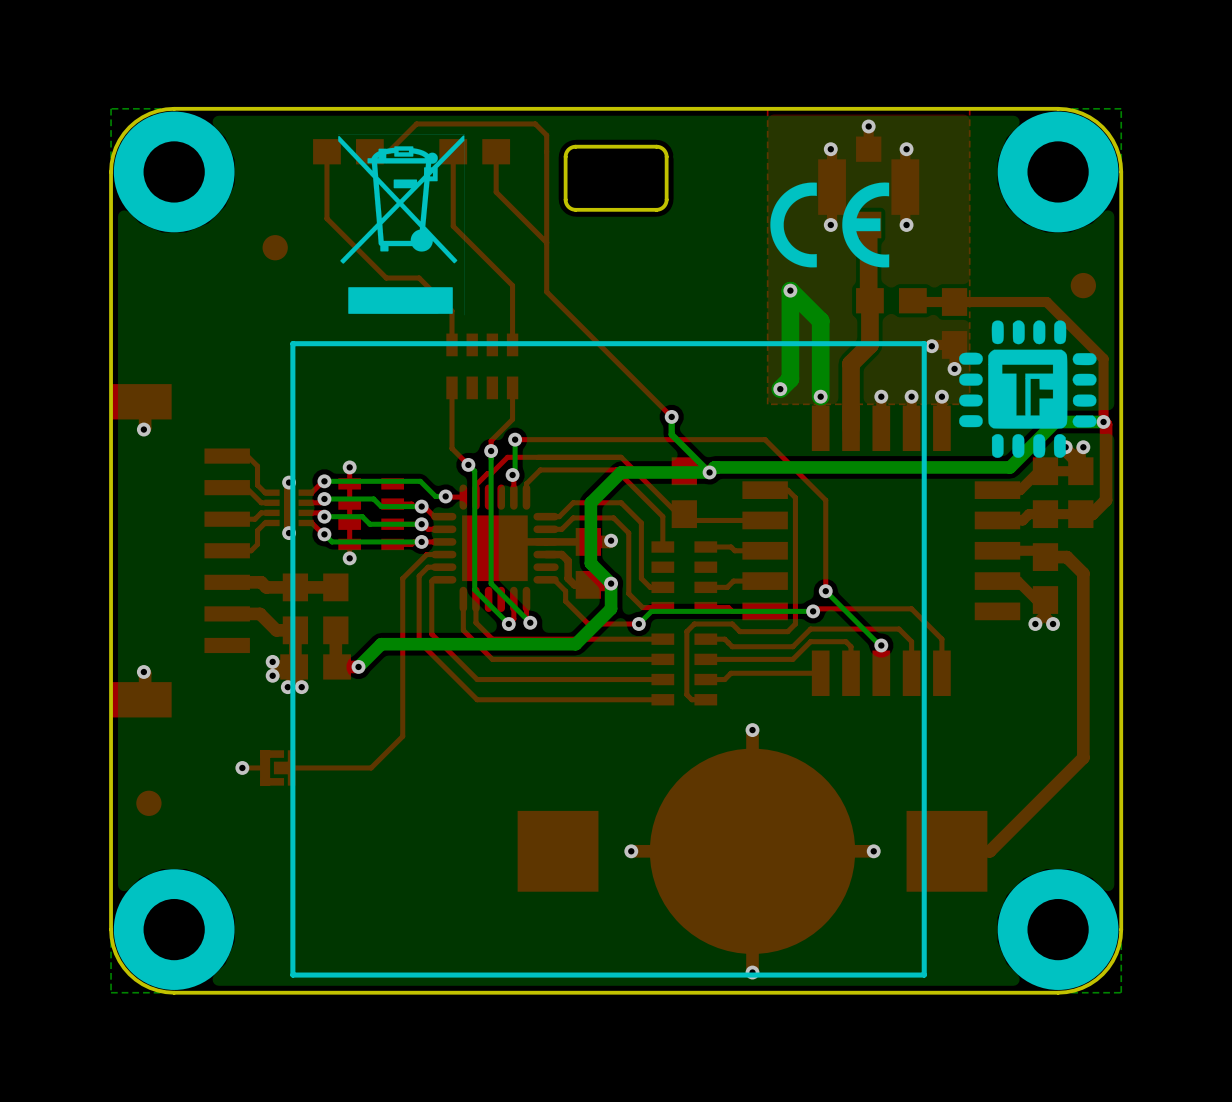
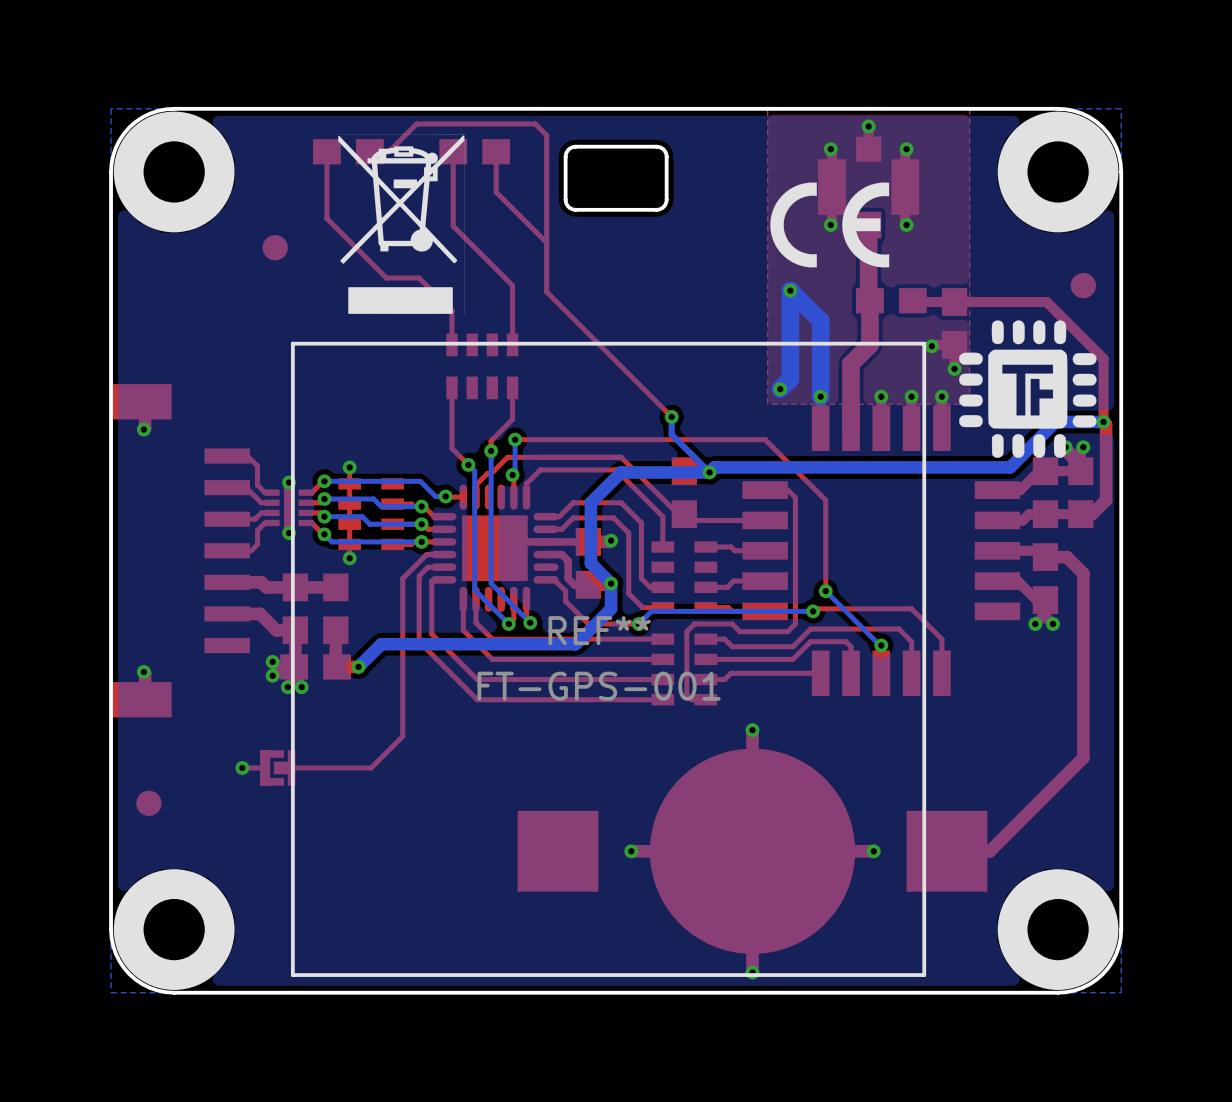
line: (924, 343) (292, 343) (292, 975) (924, 975) (924, 343) -> none
REF**: none -> FT-GPS-001 (608, 659)

